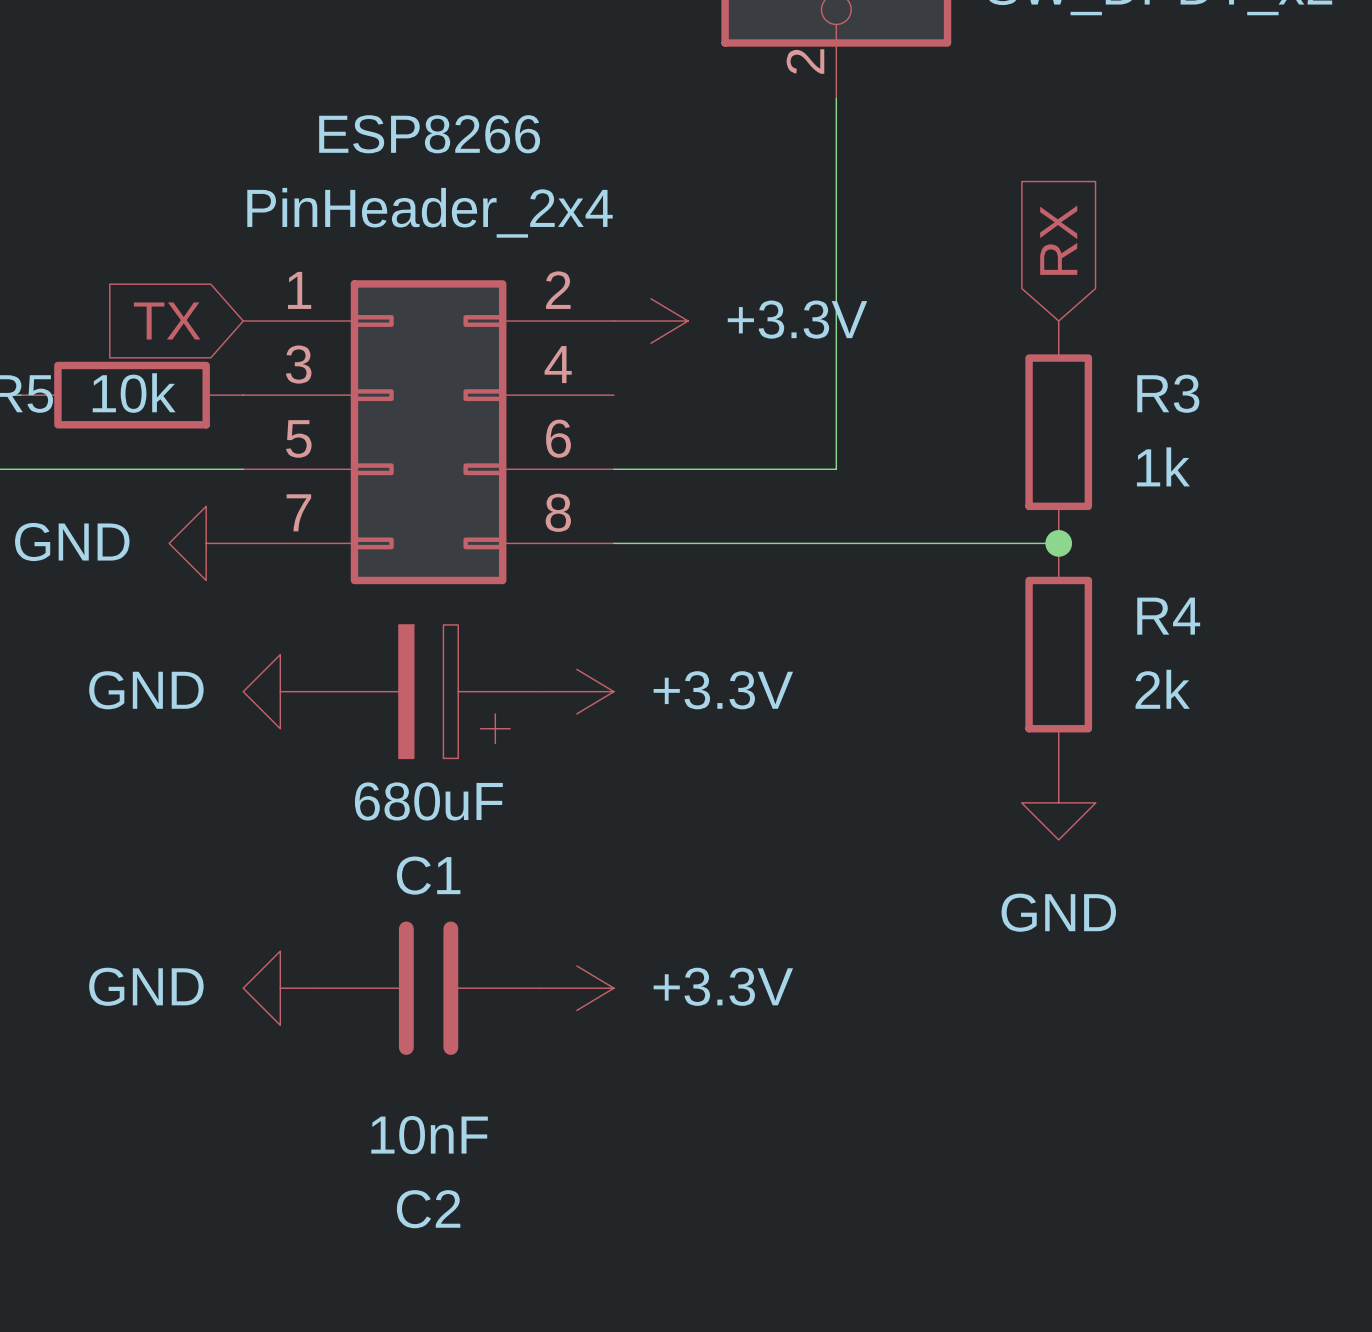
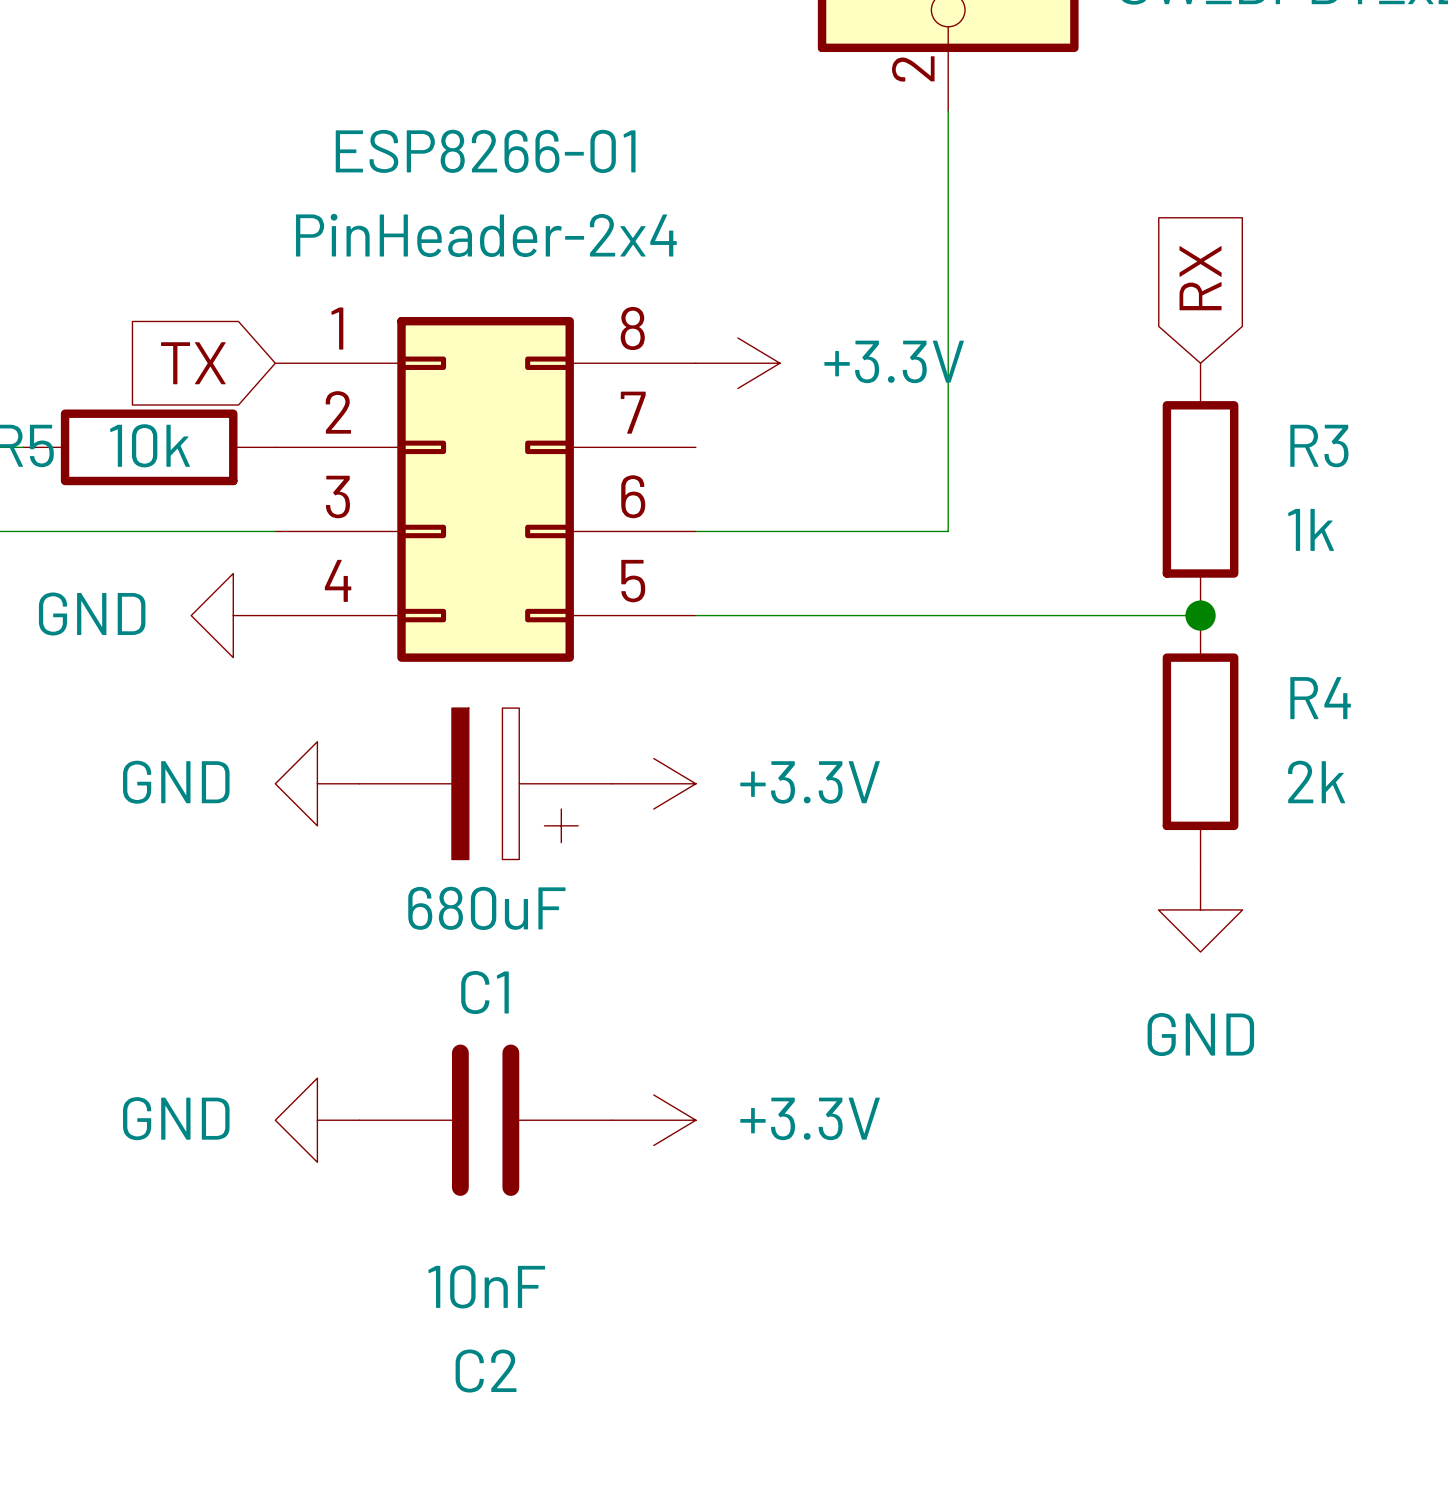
ESP8266 name: ESP8266 (429, 134) -> ESP8266-01 (485, 151)
ESP8266 value: PinHeader_2x4 (430, 212) -> PinHeader-2x4 (486, 235)
ESP8266 pin number: 2 (558, 290) -> 8 (632, 328)
ESP8266 pin number: 3 (298, 364) -> 2 (338, 412)
ESP8266 pin number: 4 (558, 364) -> 7 (633, 412)
ESP8266 pin number: 5 (298, 438) -> 3 (337, 497)
ESP8266 pin number: 7 (298, 512) -> 4 (338, 580)
ESP8266 pin number: 8 (558, 512) -> 5 (633, 581)

